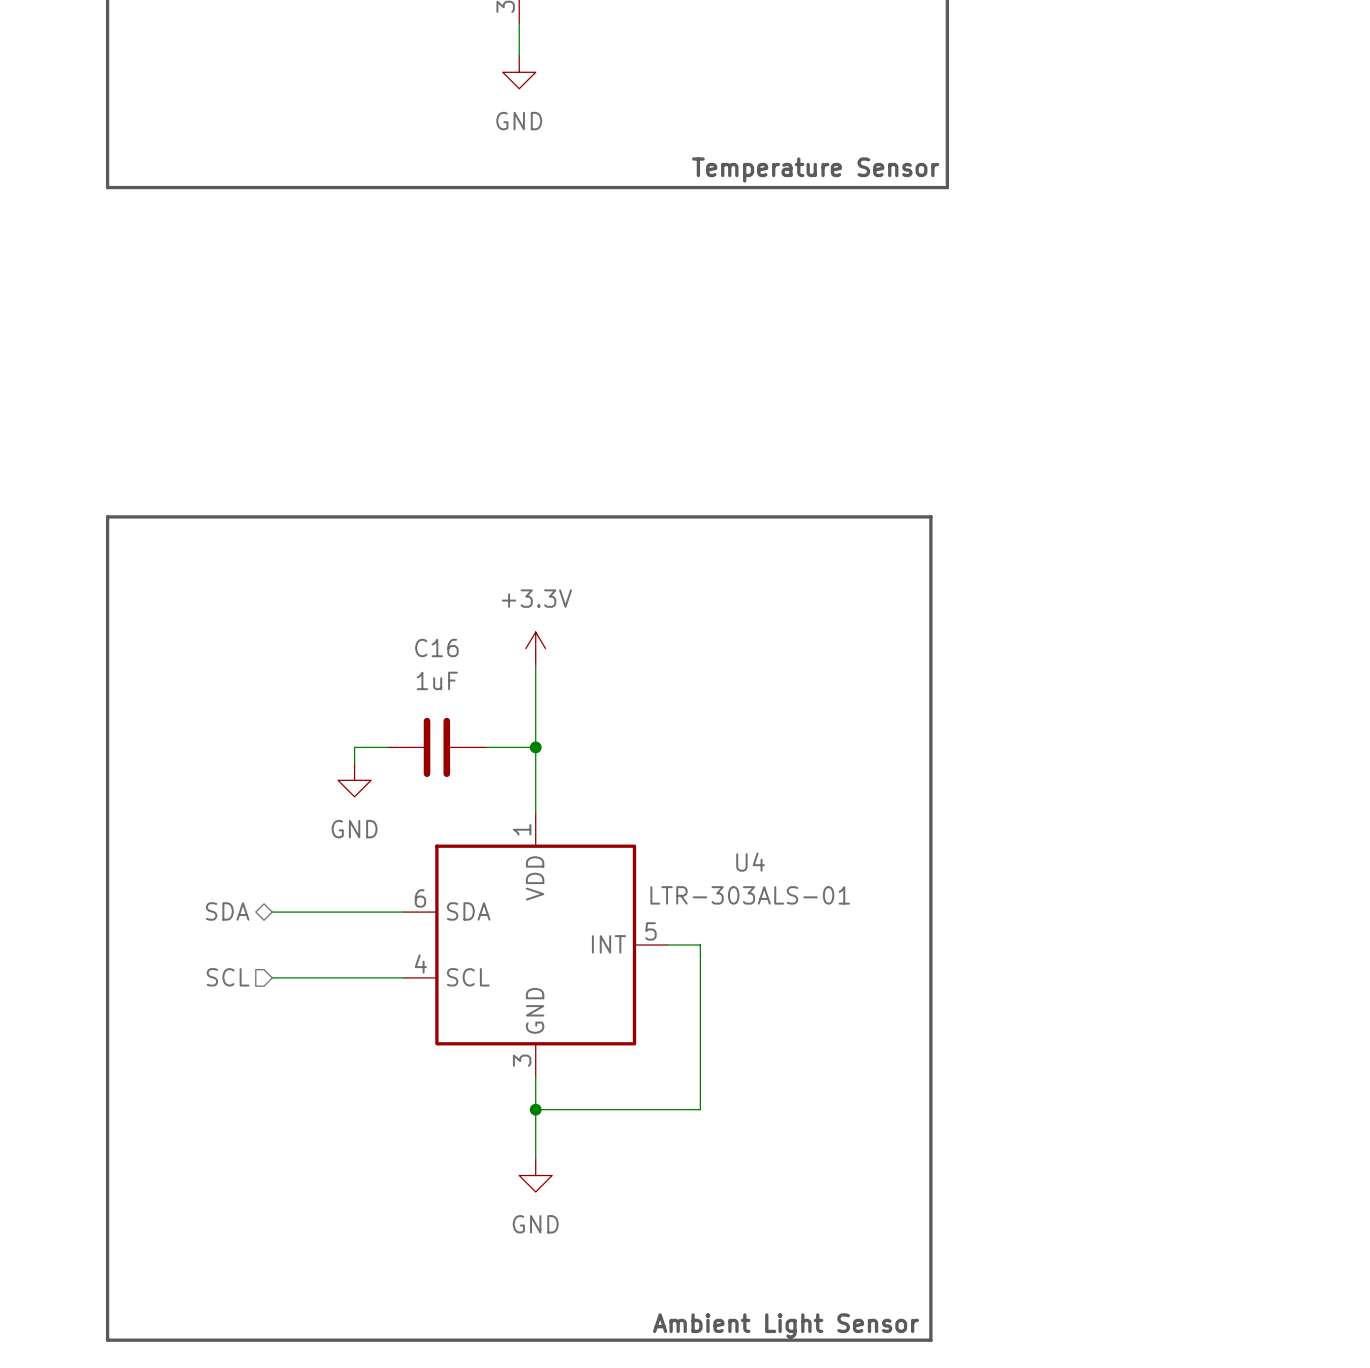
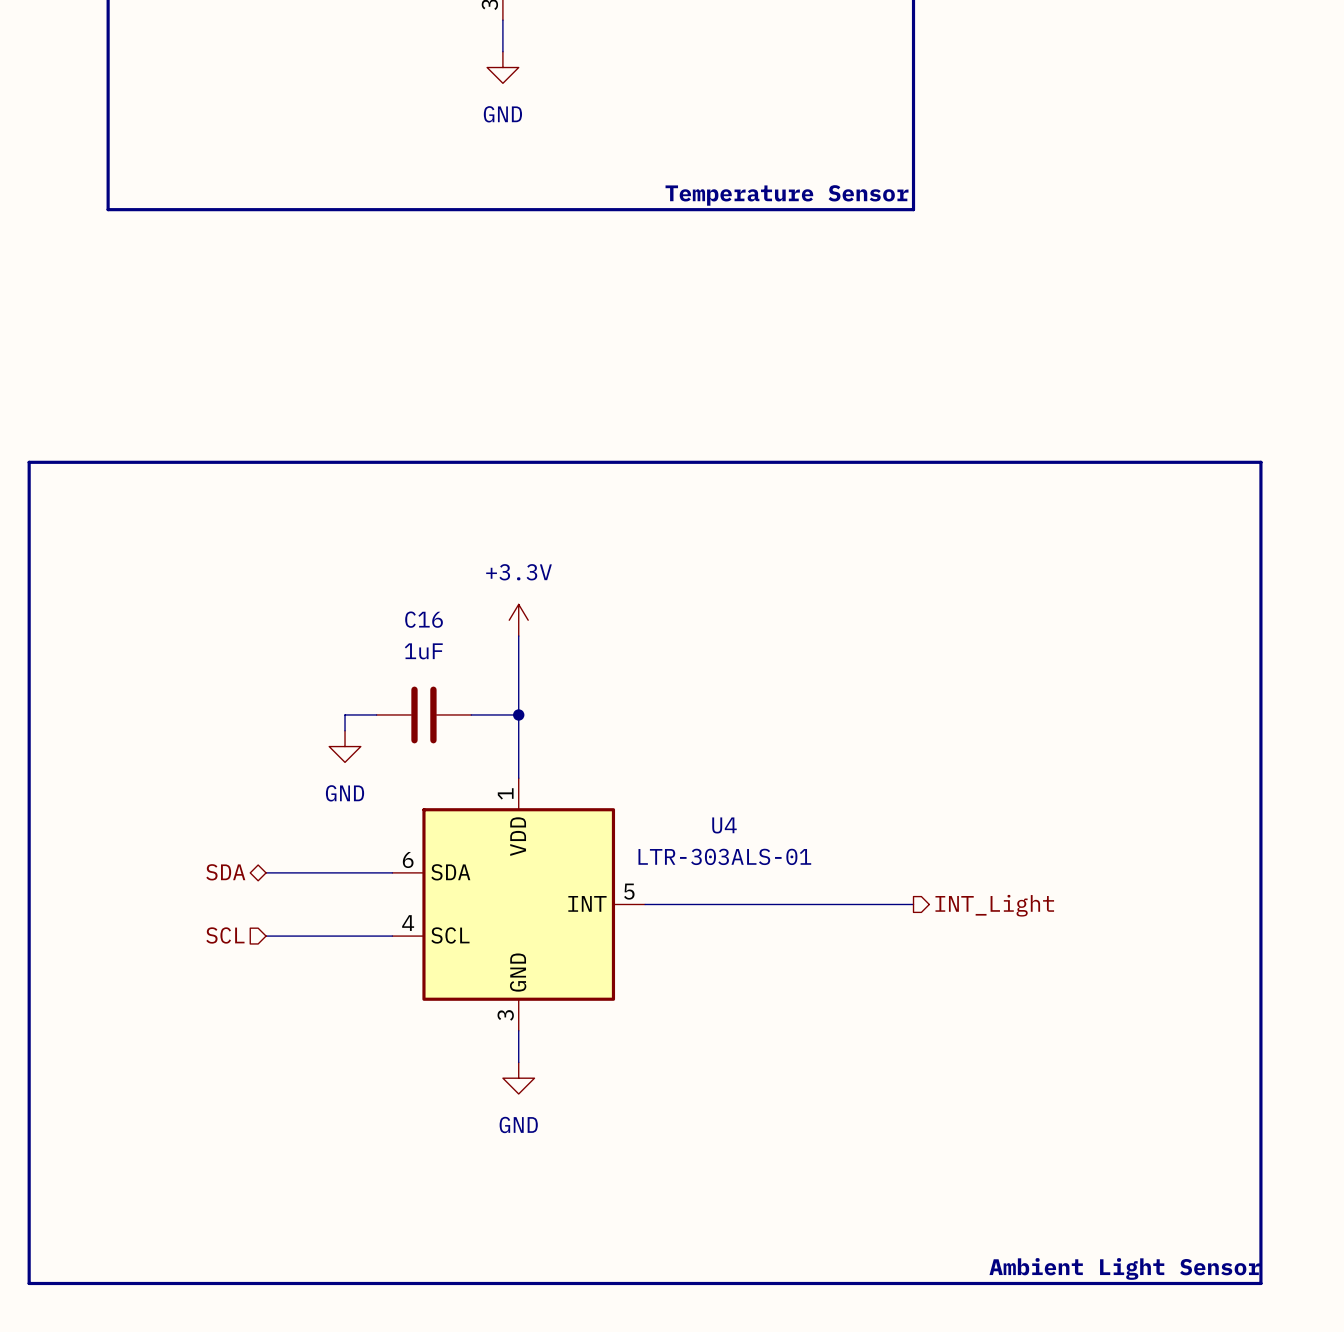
text position: Temperature Sensor (815, 169) -> Temperature Sensor (787, 195)
line: (107, 187) (947, 187) -> (108, 178) (108, 209) (913, 209) (913, 178)
wire: (700, 945) (700, 1109) (535, 1109) (535, 1159) -> (676, 904) (913, 904)
hierarchical label: none -> INT_Light (994, 905)
junction: (535, 1109) -> none
power symbol position: GND (535, 1175) -> GND (518, 1078)
text: Ambient Light Sensor (785, 1325) -> none
text: none -> Ambient Light Sensor (1124, 1268)
line: (107, 1340) (107, 516) (930, 516) (930, 1340) -> (108, 1283) (29, 1283) (29, 462) (1260, 462) (1260, 1283) (897, 1283)

